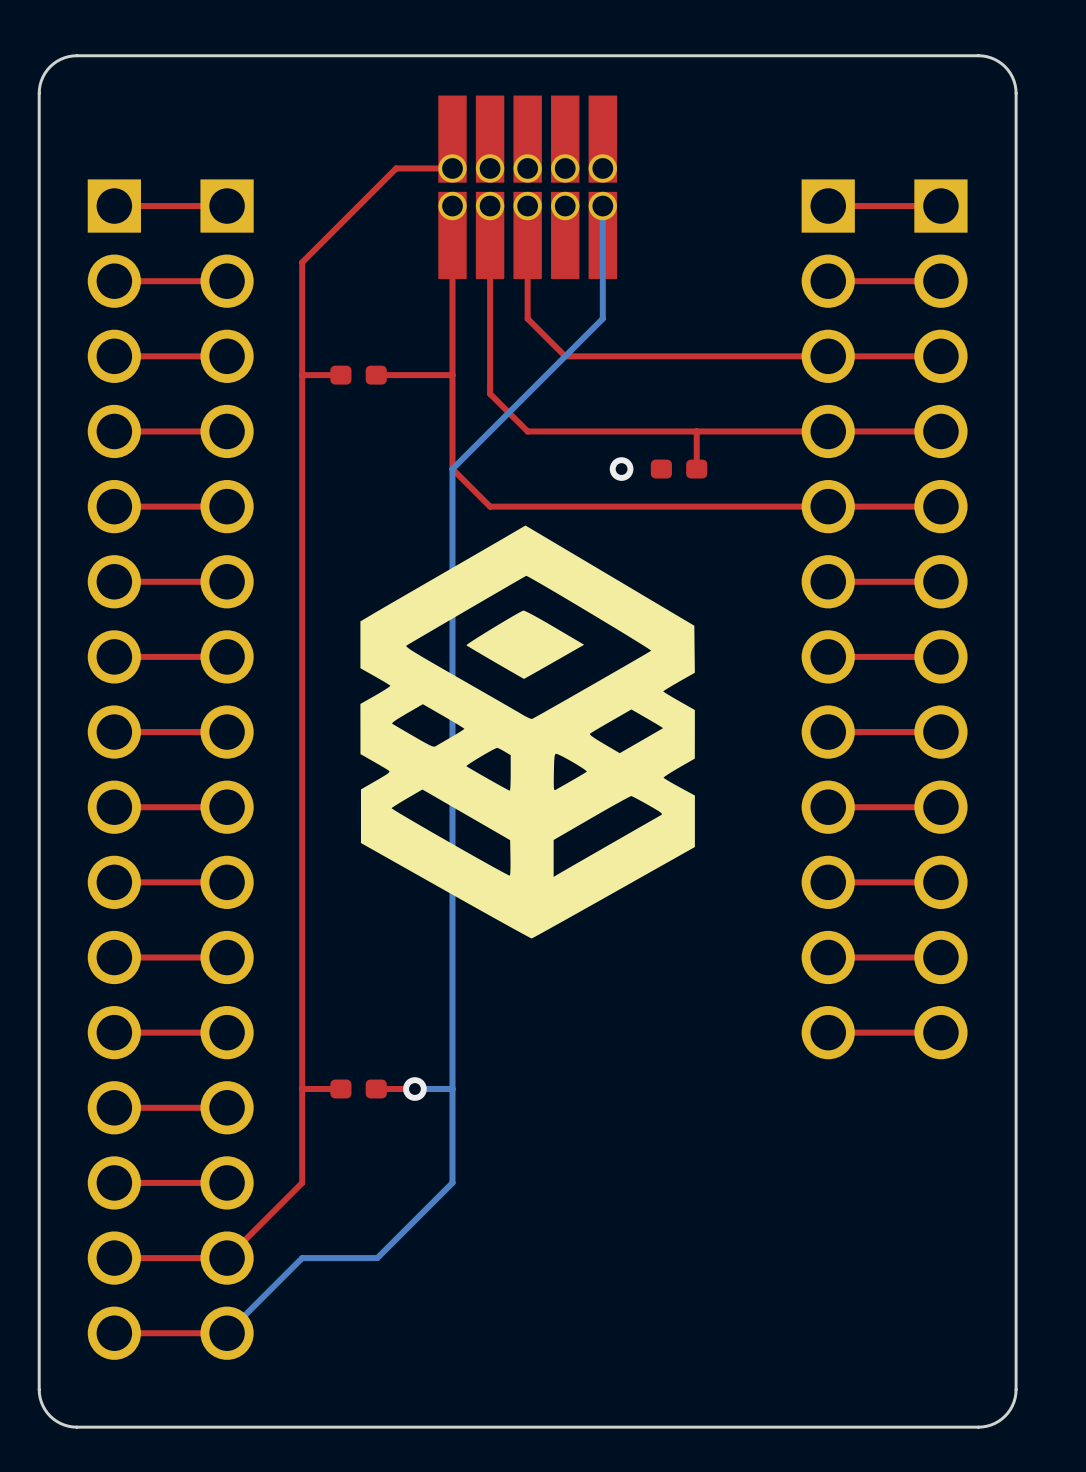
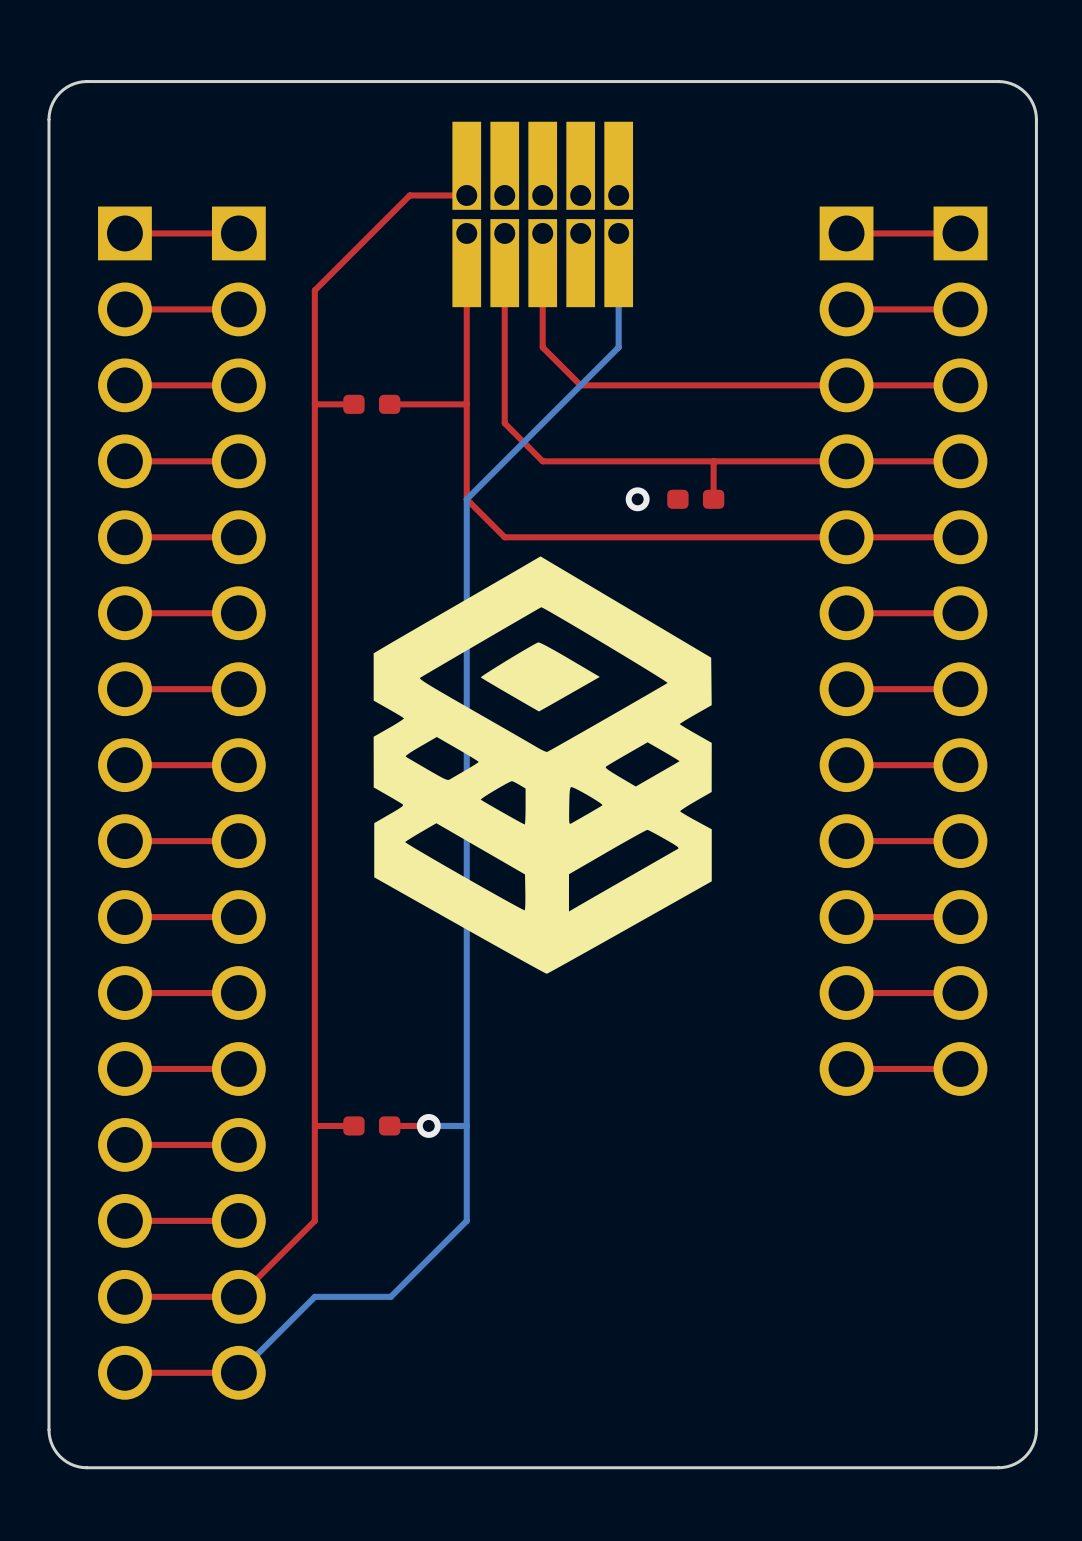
part footprint: [438, 95, 618, 279] -> [452, 121, 634, 308]

